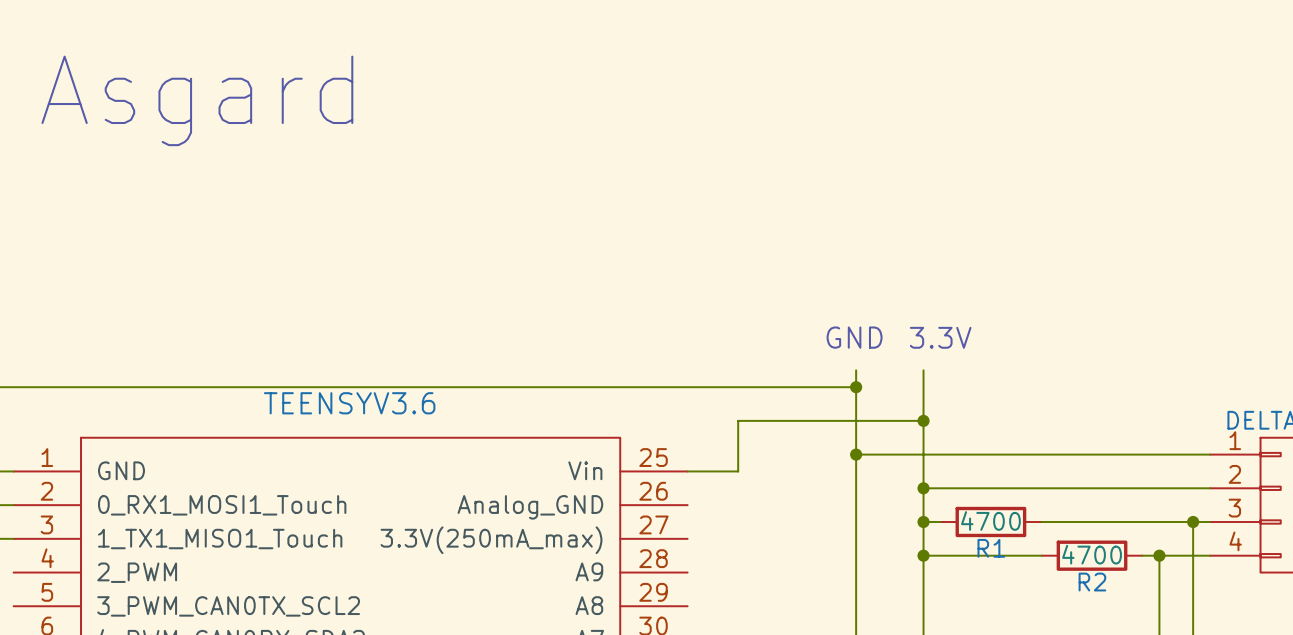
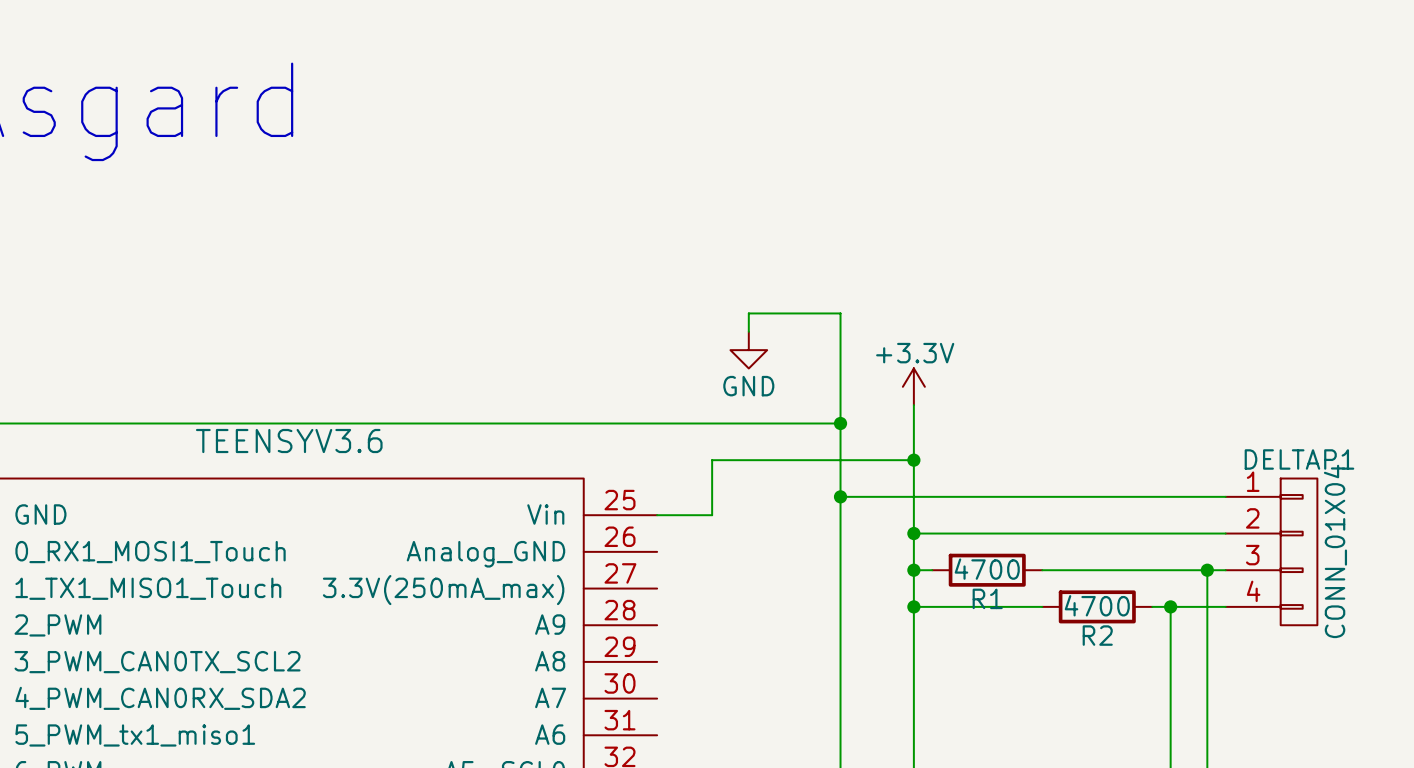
wire: none -> (748, 331) (748, 313) (840, 313) (840, 405)
power symbol: none -> GND (748, 350)
text: GND (854, 337) -> none
text: 3.3V (940, 337) -> none
power symbol: none -> +3.3V (913, 386)

